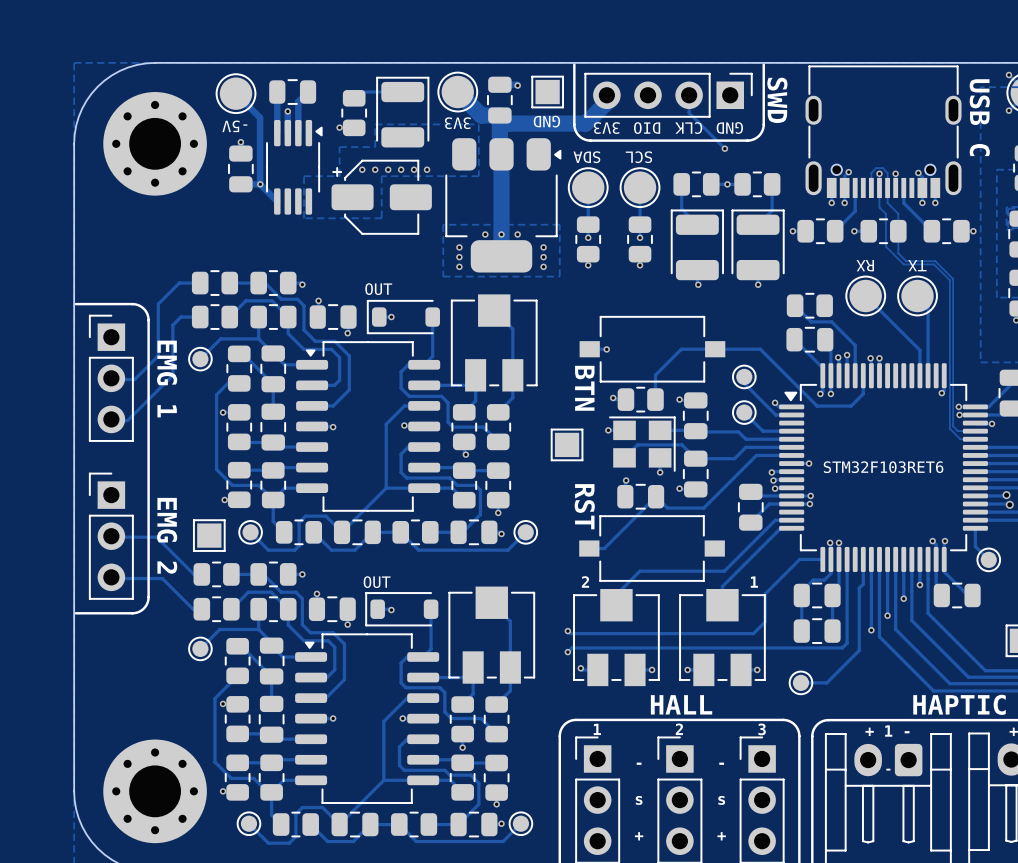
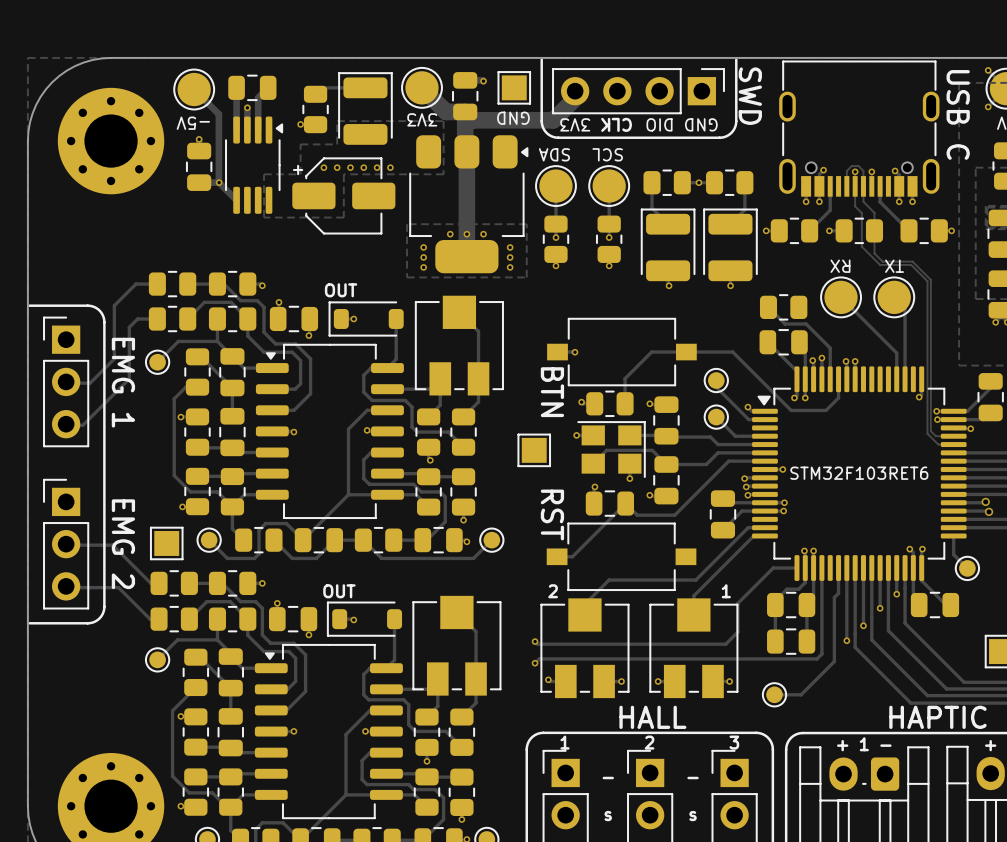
track: (689, 95) (689, 112) (724, 148) -> none
text: DIO (647, 128) -> CLK (616, 124)
text: CLK (688, 128) -> DIO (659, 124)
via: (724, 148) -> none

